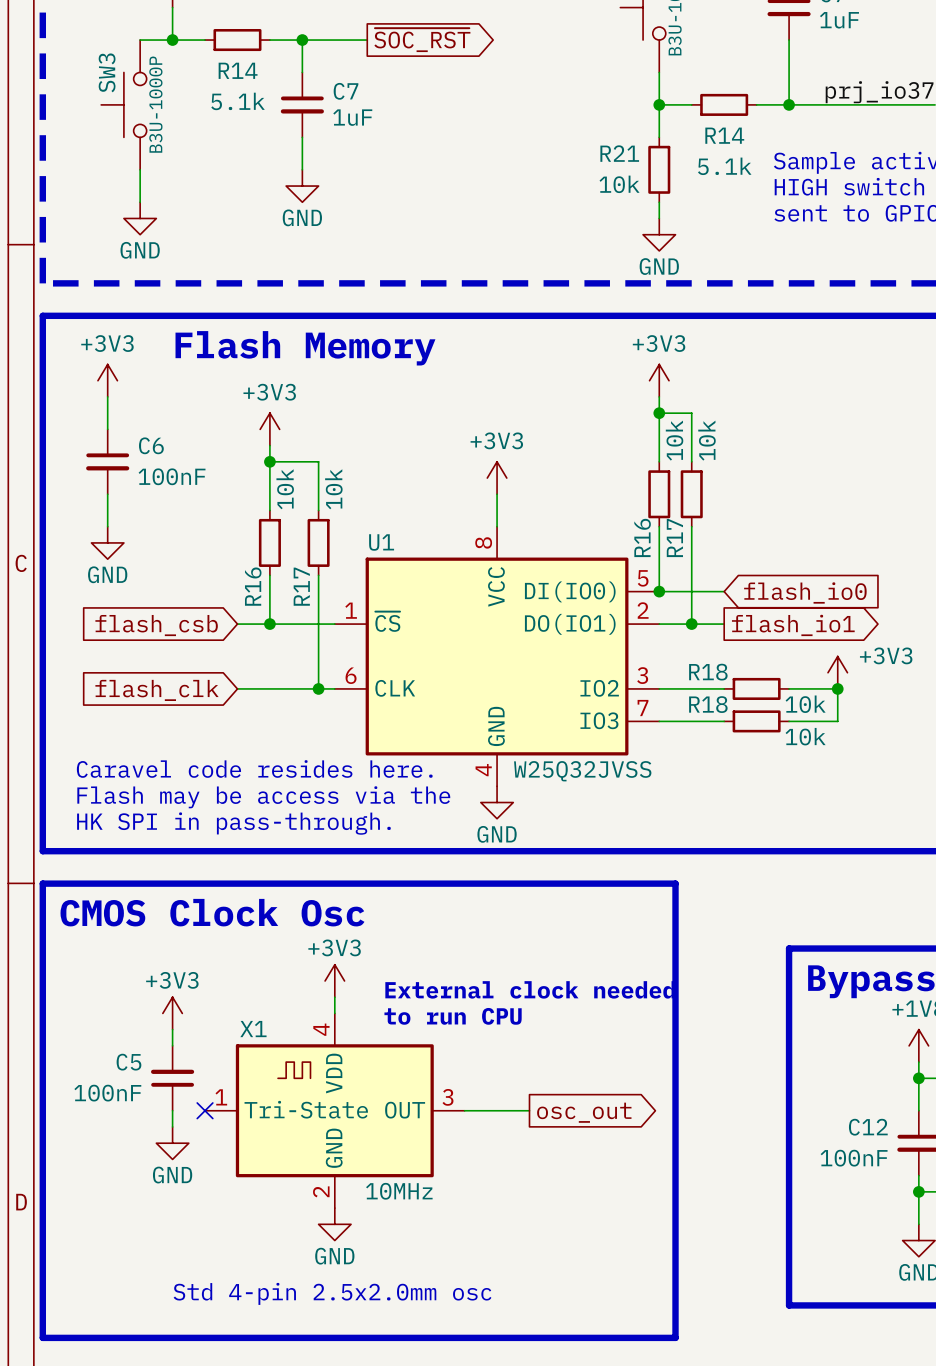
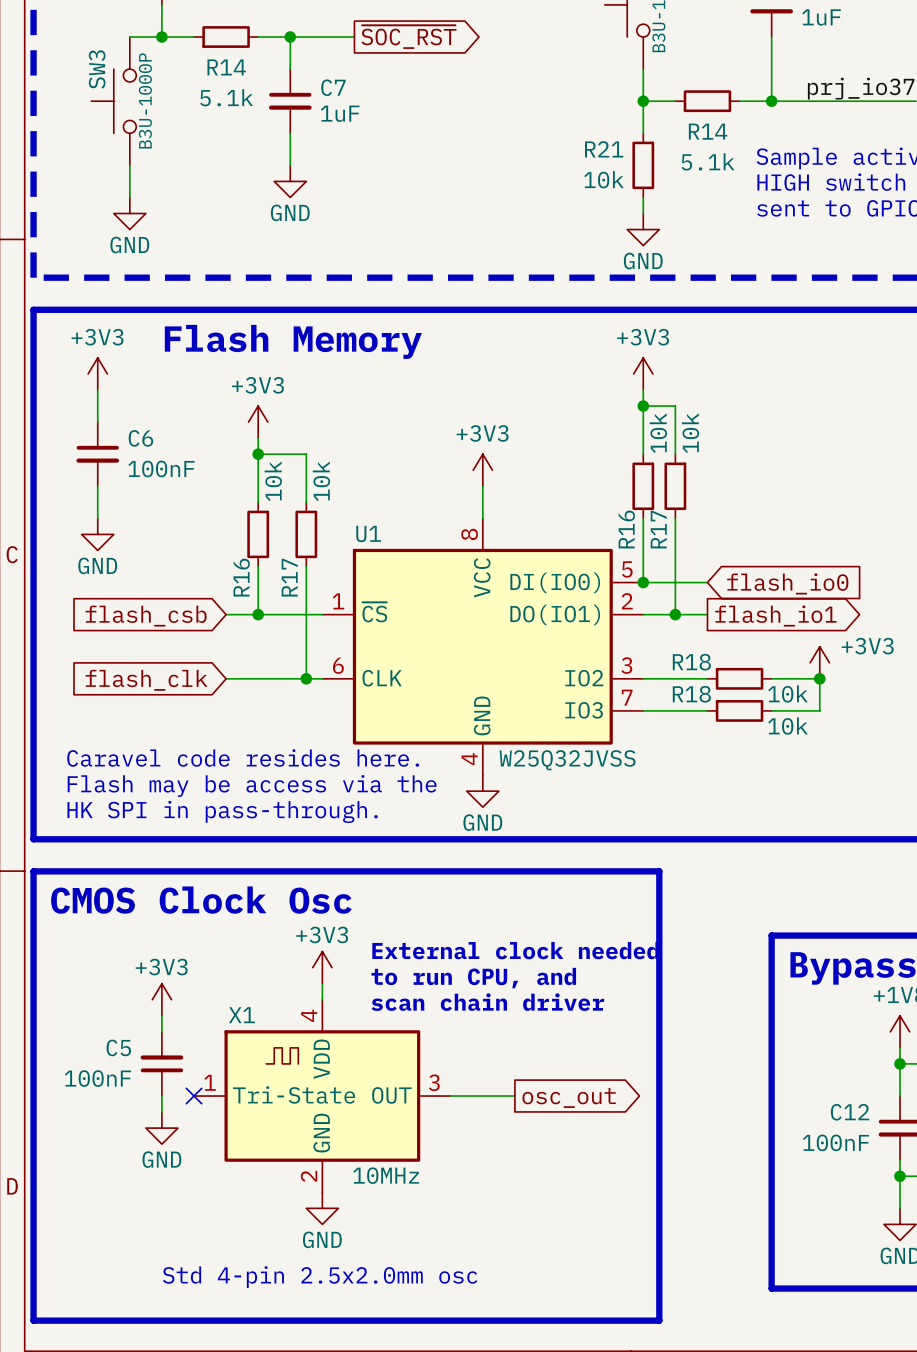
text: none -> External clock needed (515, 950)
text: External clock needed (530, 989) -> to run CPU, and (473, 978)
text: to run CPU (453, 1016) -> scan chain driver (487, 1002)

